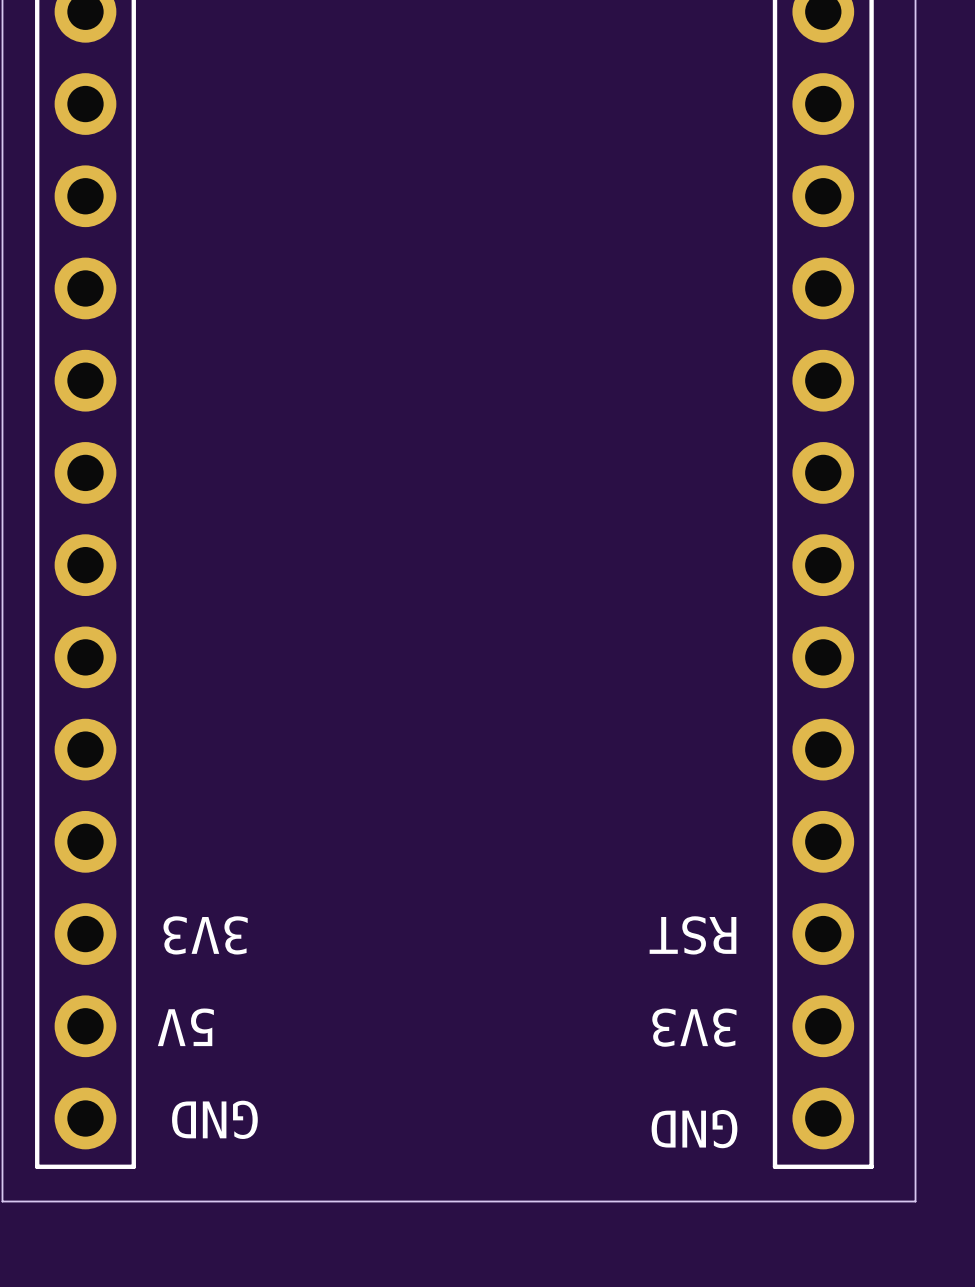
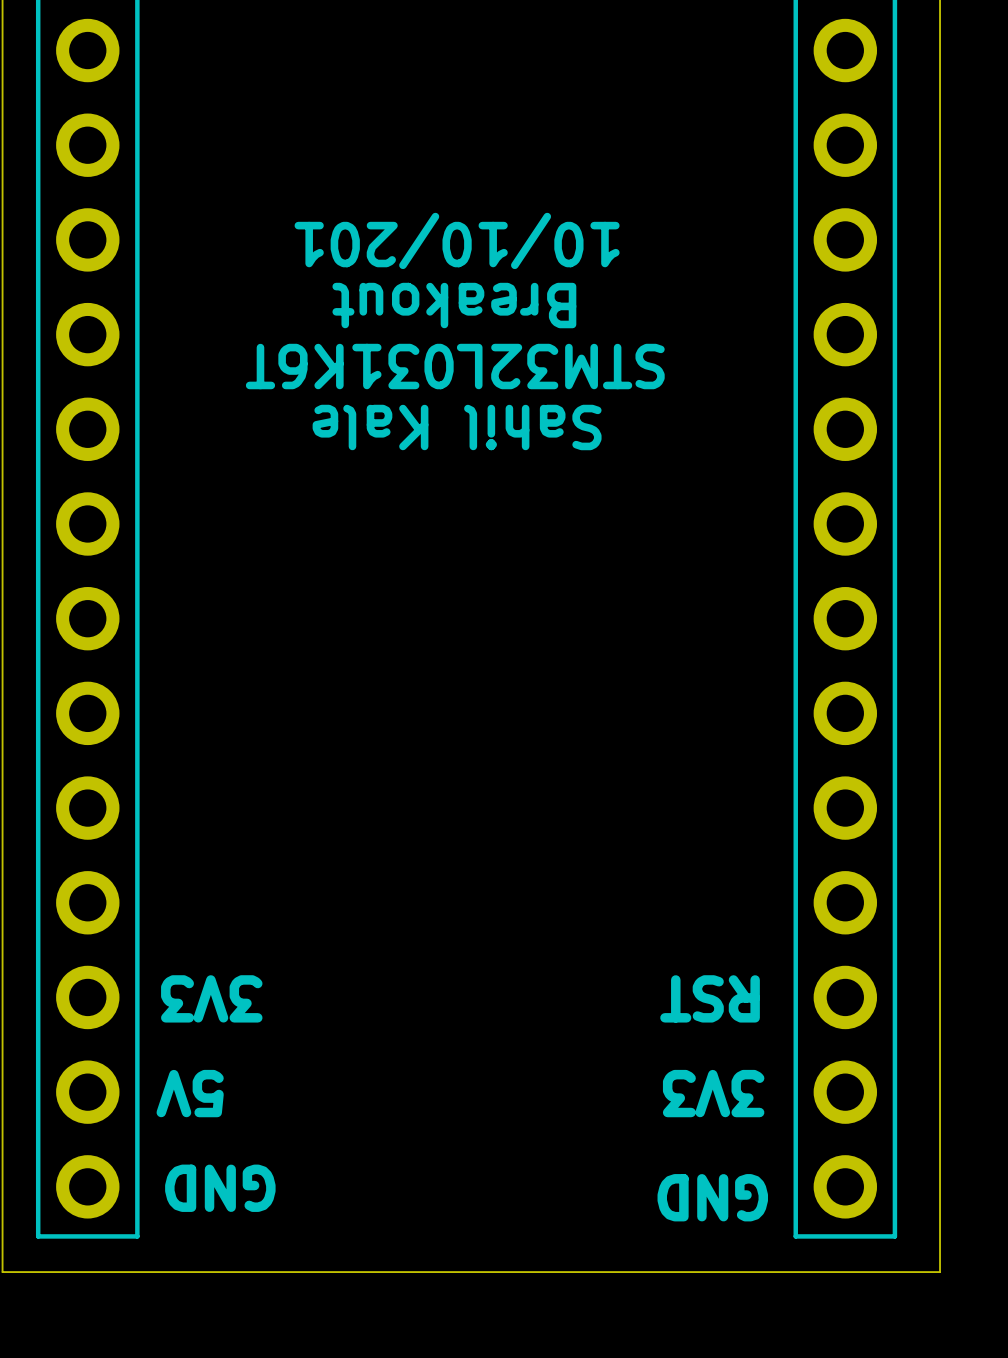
text: none -> 10/10/201 (457, 240)
text: none -> Breakout (454, 305)
text: none -> STM32L031K6T (455, 366)
text: none -> Sahil Kale (457, 427)

